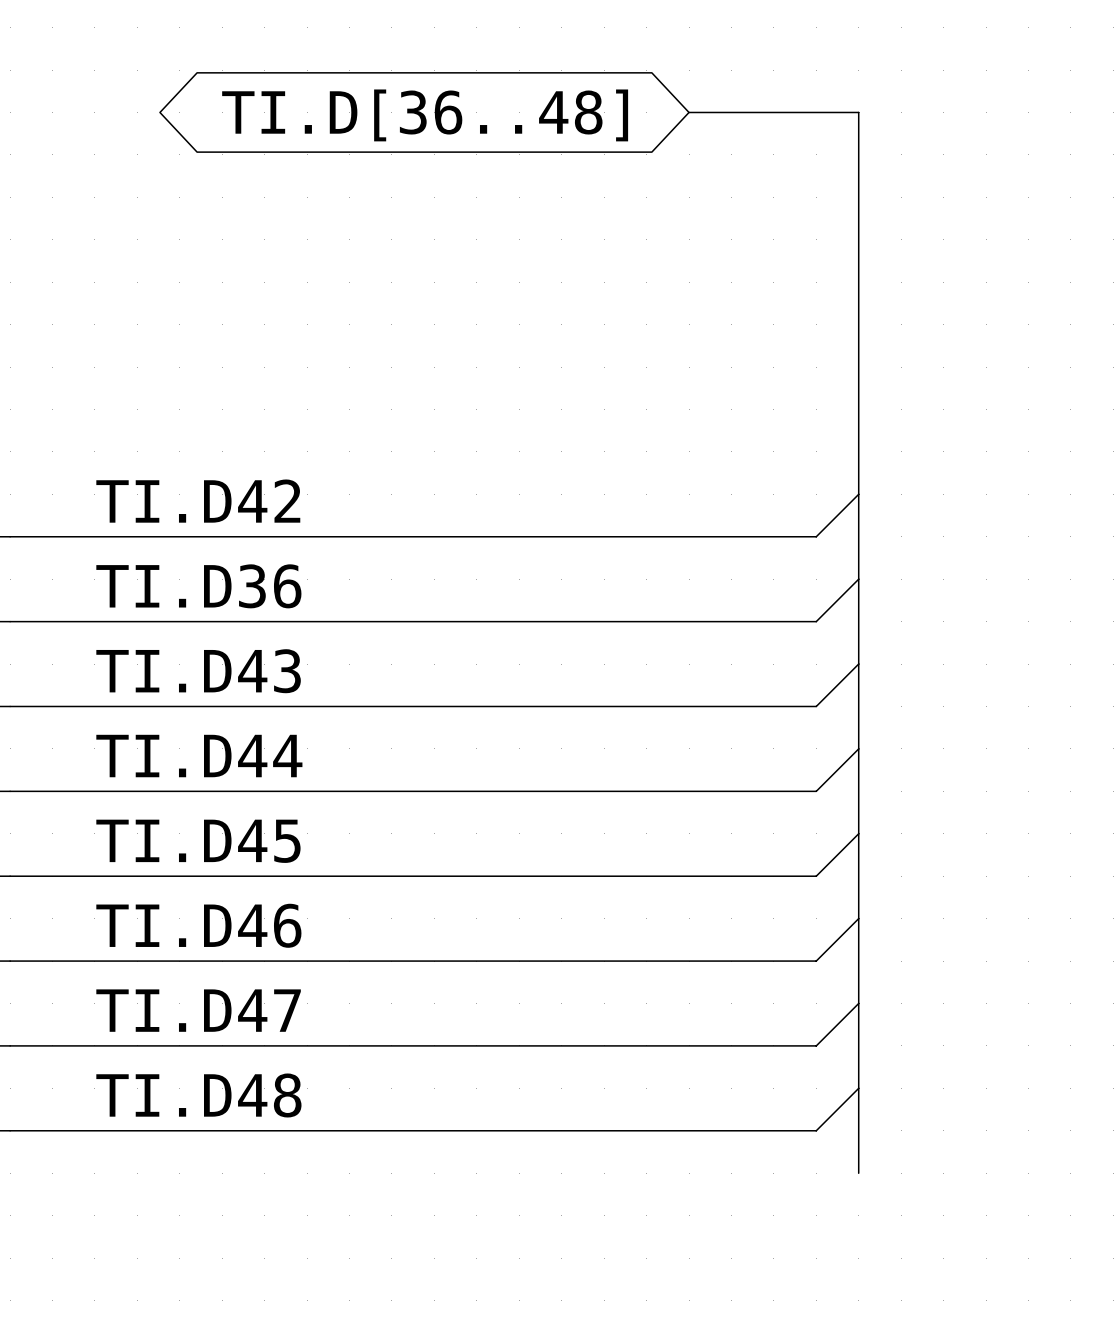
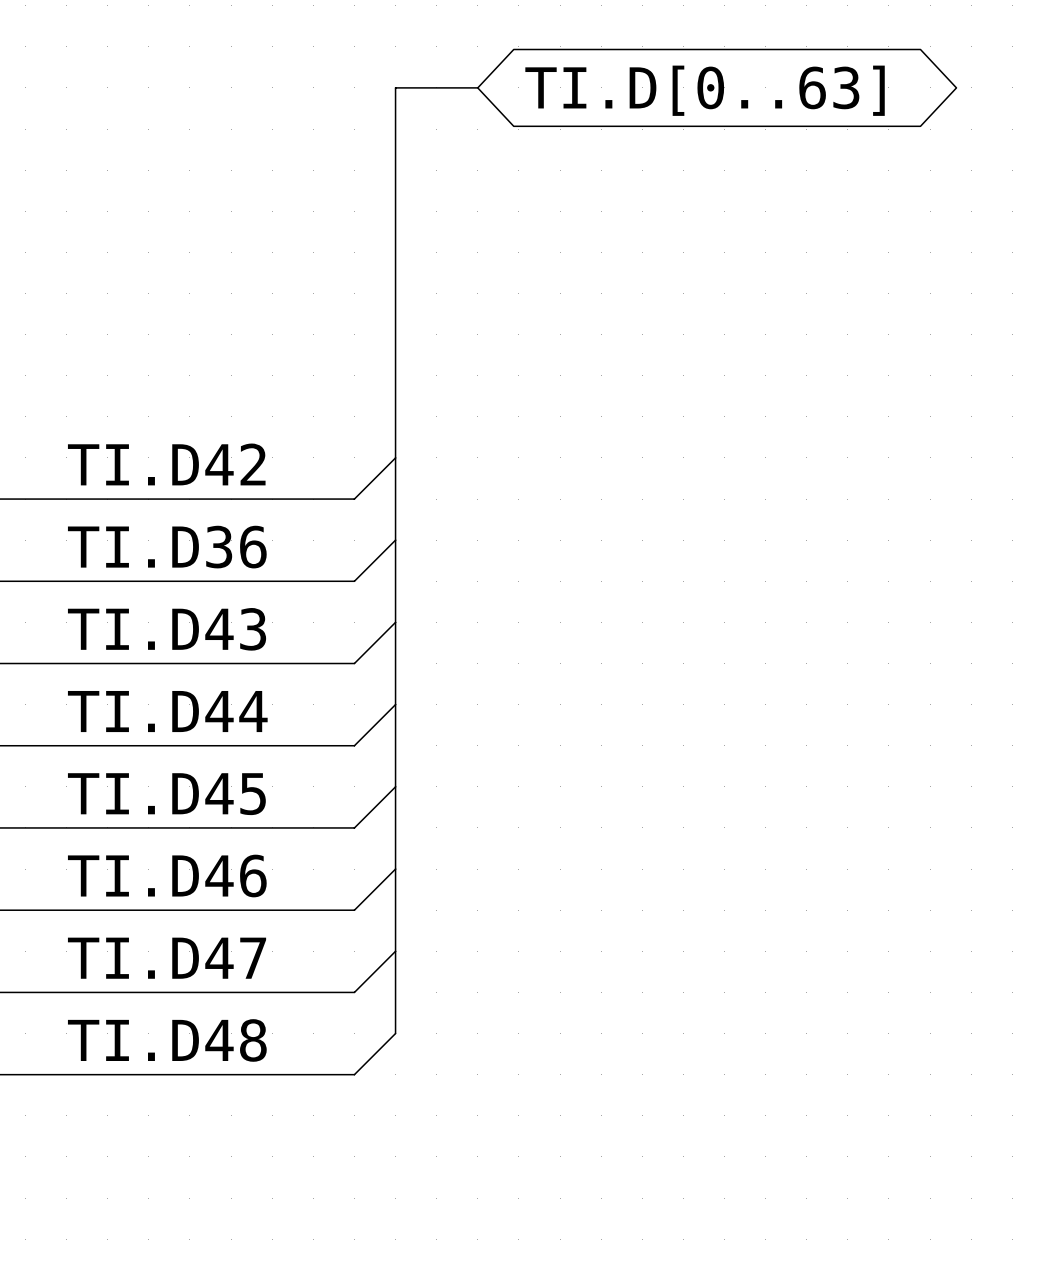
bus: none -> (477, 87) (395, 87) (395, 1033)
bus: (689, 112) (858, 112) (858, 1173) -> none
global label: TI.D[36..48] (425, 115) -> TI.D[0..63] (705, 90)
wire: (858, 494) (816, 536) (391, 536) -> (395, 457) (354, 499)
wire: (858, 579) (816, 621) (391, 621) -> (395, 540) (354, 581)
wire: (858, 664) (816, 706) (391, 706) -> (395, 622) (354, 663)
wire: (858, 748) (816, 791) (391, 791) -> (395, 704) (354, 745)
wire: (858, 833) (816, 876) (391, 876) -> (395, 786) (354, 827)
wire: (858, 918) (816, 961) (391, 961) -> (395, 869) (354, 910)
wire: (858, 1003) (816, 1045) (391, 1045) -> (395, 951) (354, 992)
wire: (858, 1088) (816, 1130) (391, 1130) -> (395, 1033) (354, 1074)

